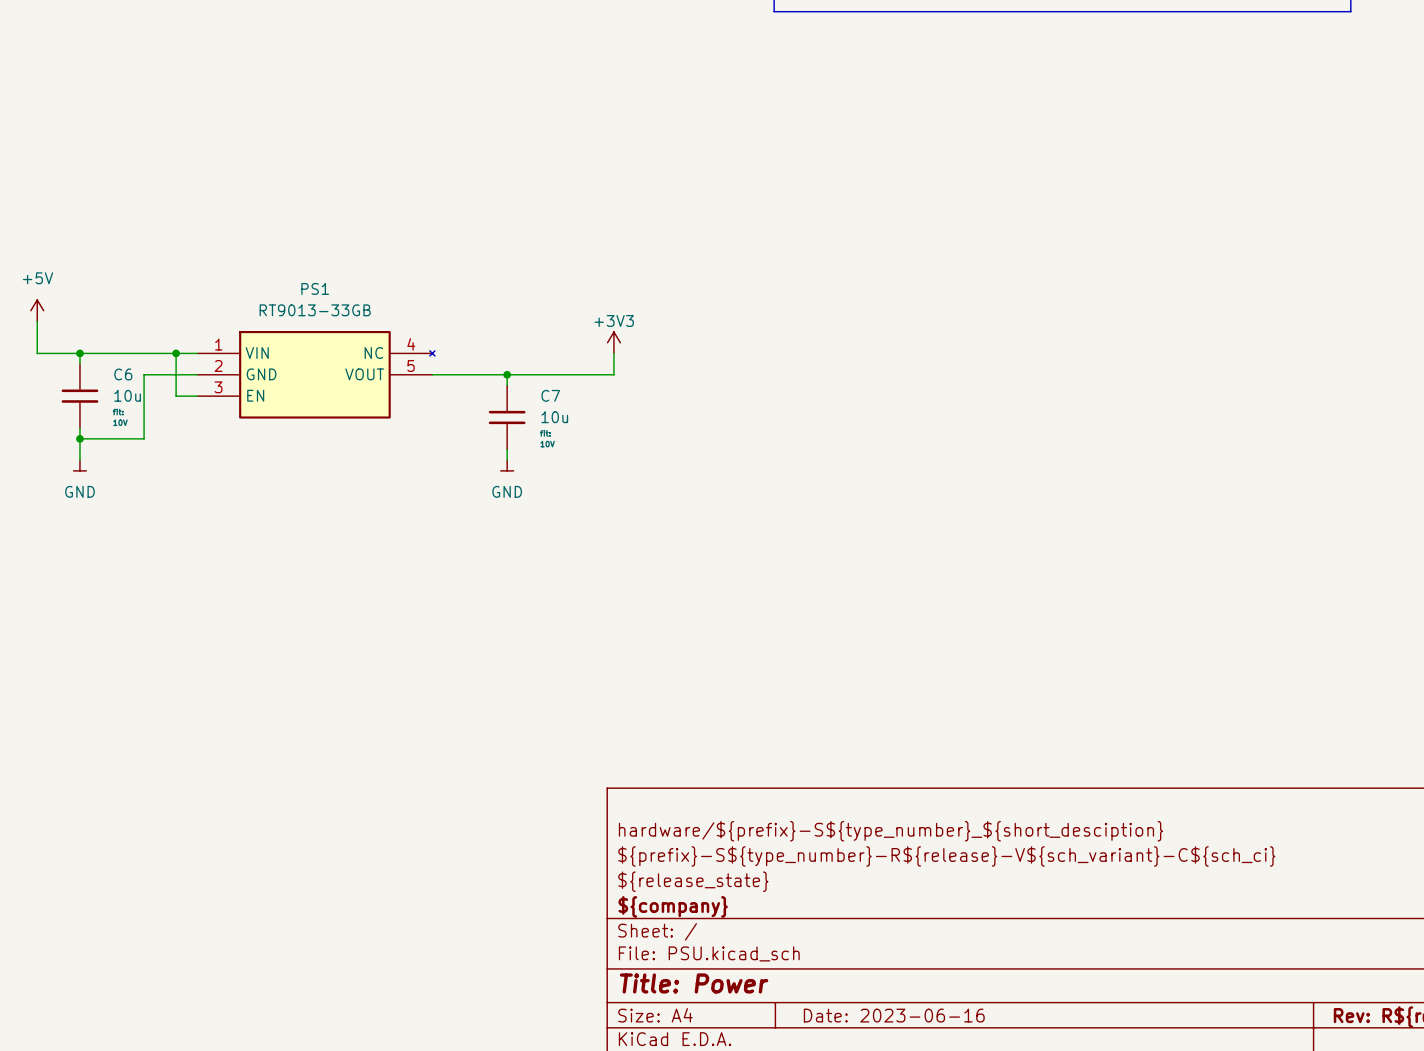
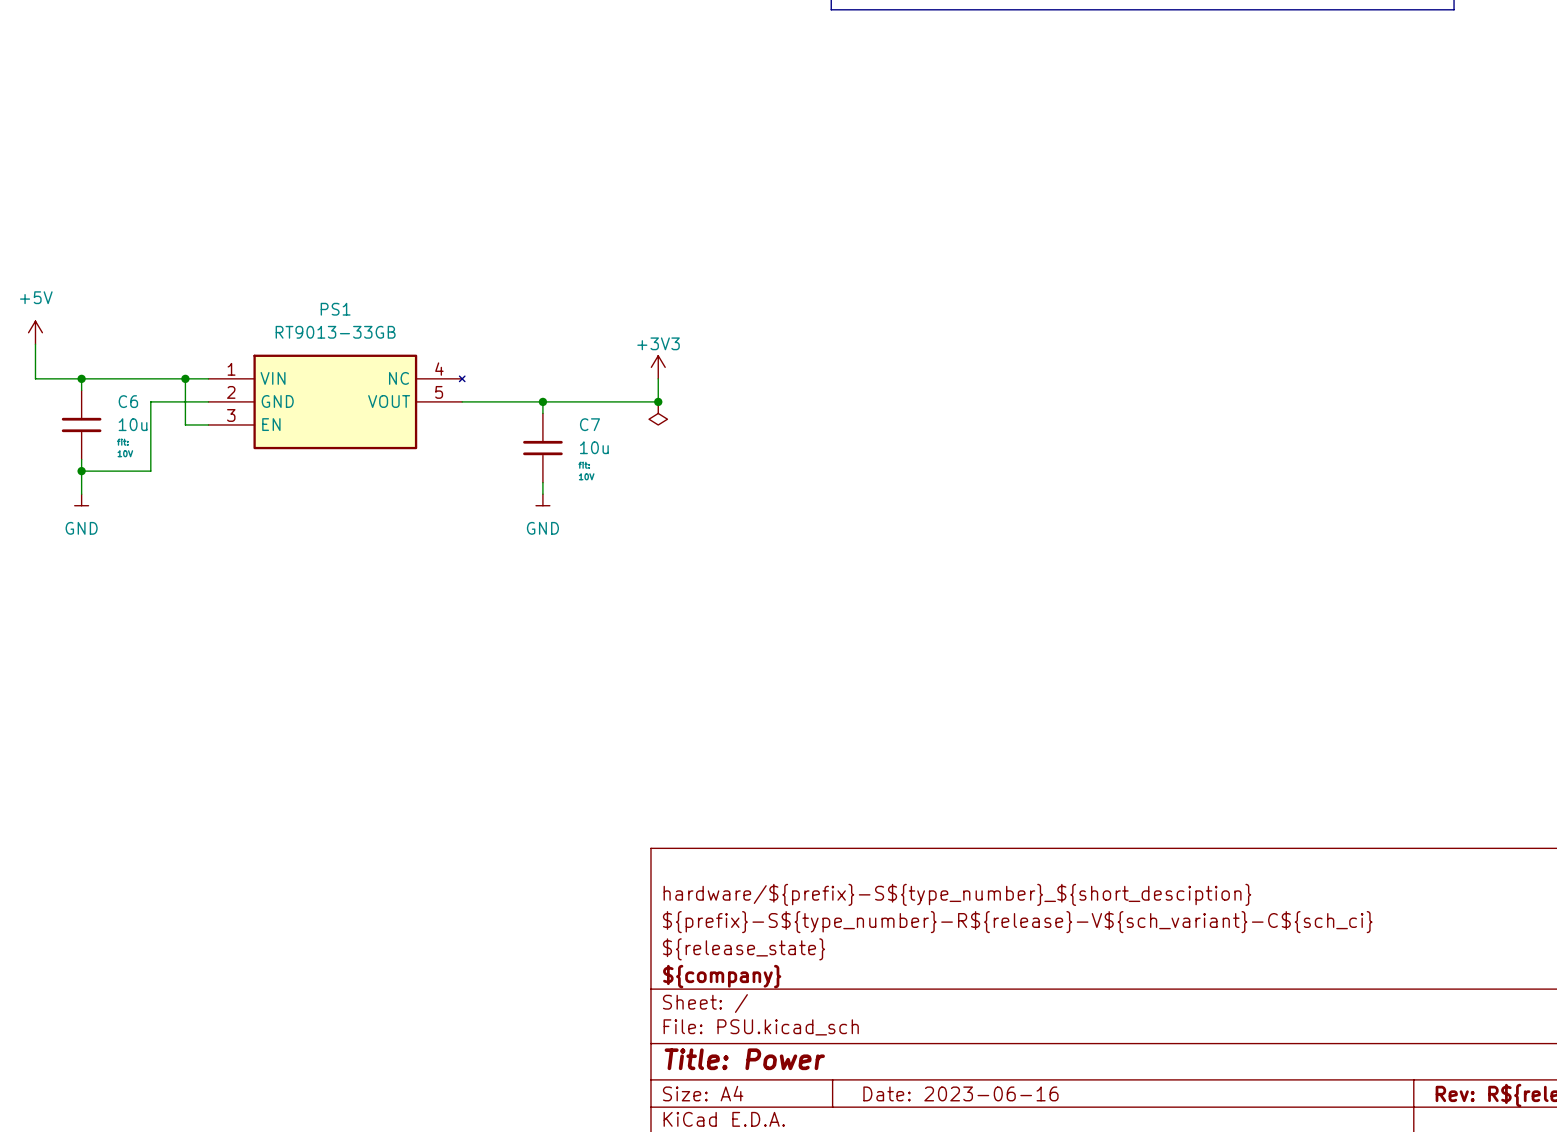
junction: none -> (658, 401)
power symbol: none -> (658, 413)

